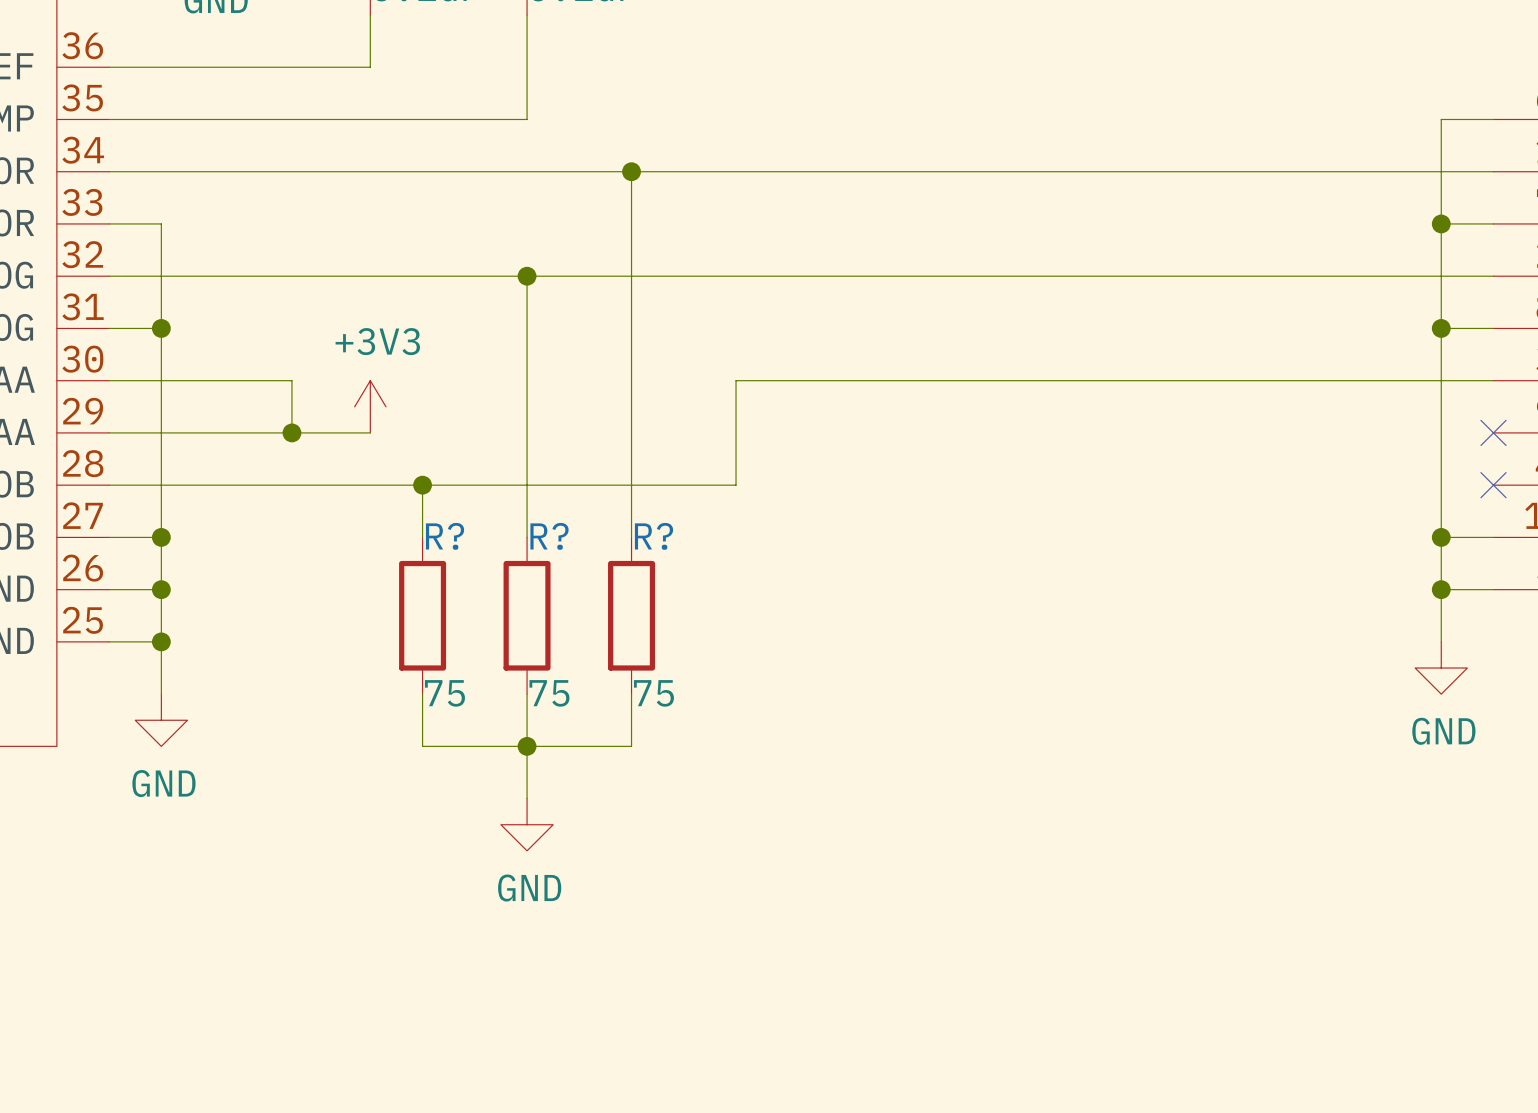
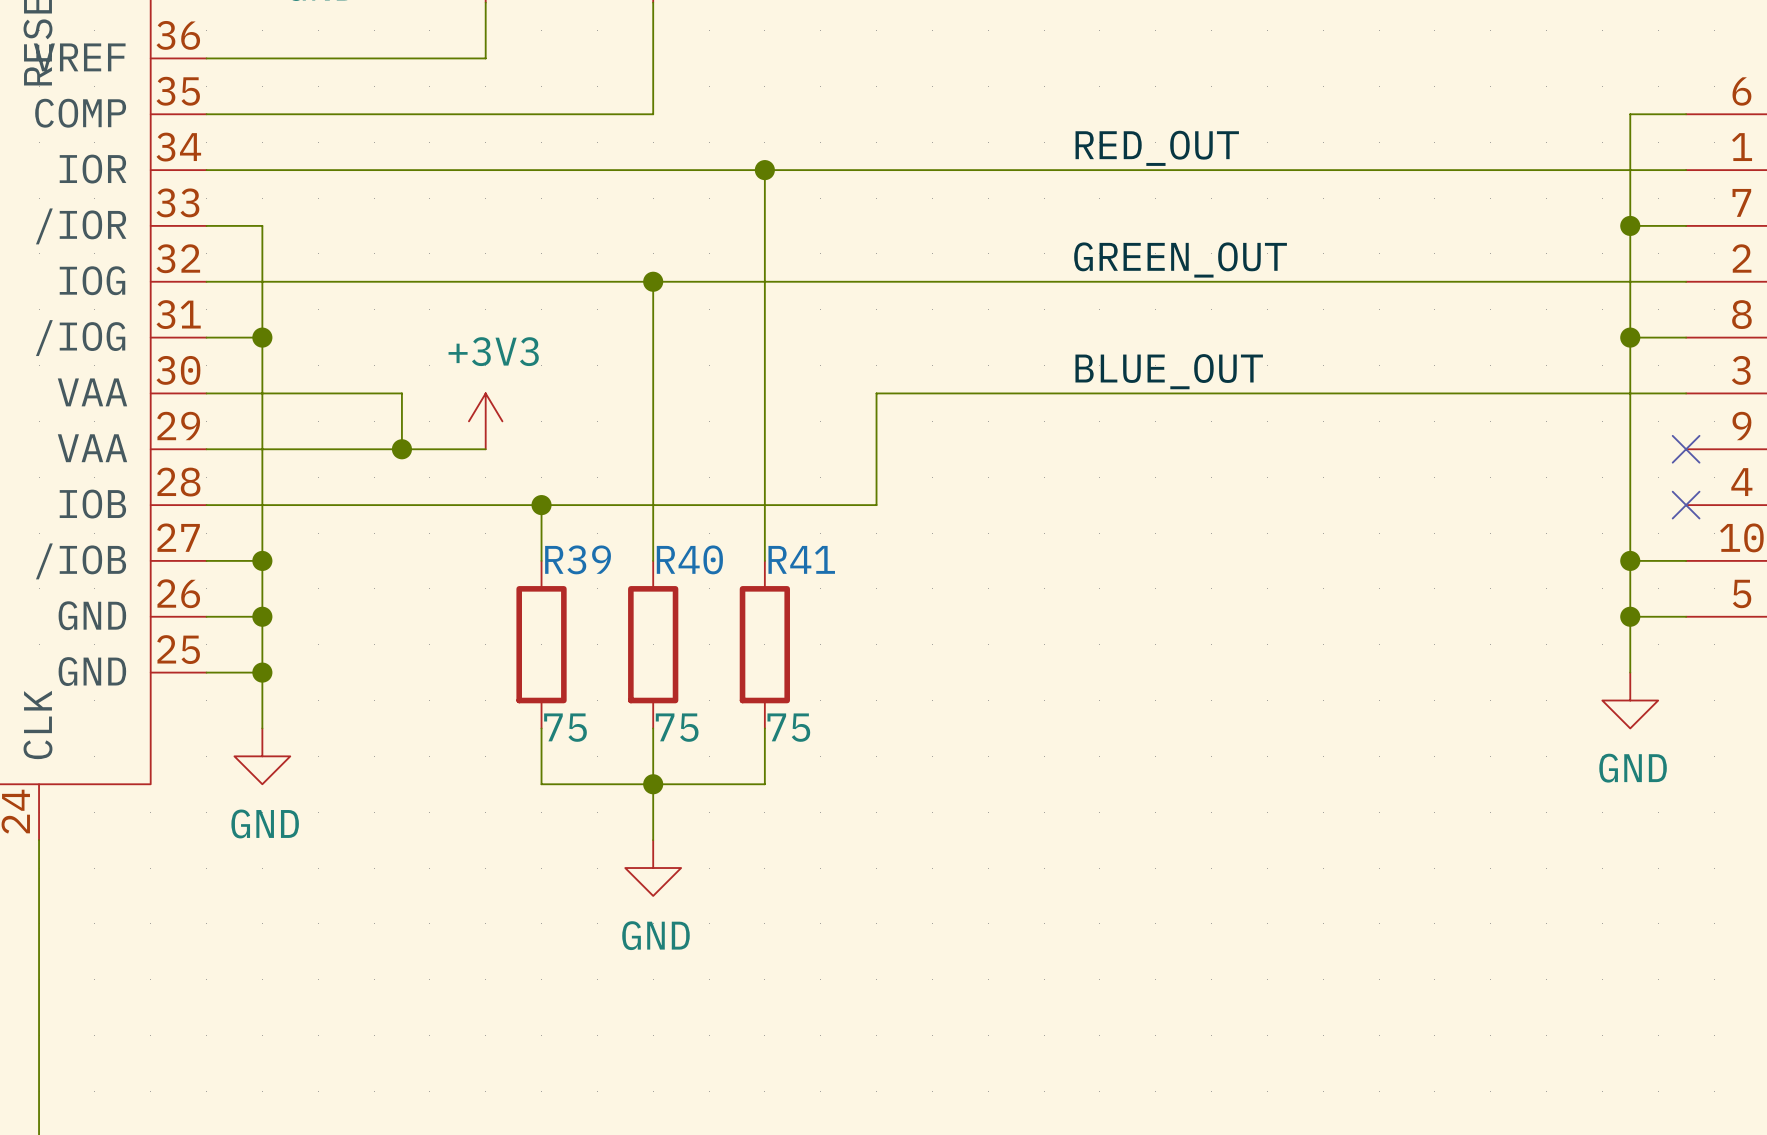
label: none -> RED_OUT (1157, 148)
label: none -> GREEN_OUT (1180, 259)
label: none -> BLUE_OUT (1169, 371)
R? name: R? (445, 536) -> R39 (578, 559)
R? name: R? (549, 536) -> R40 (689, 559)
R? name: R? (653, 536) -> R41 (801, 559)

